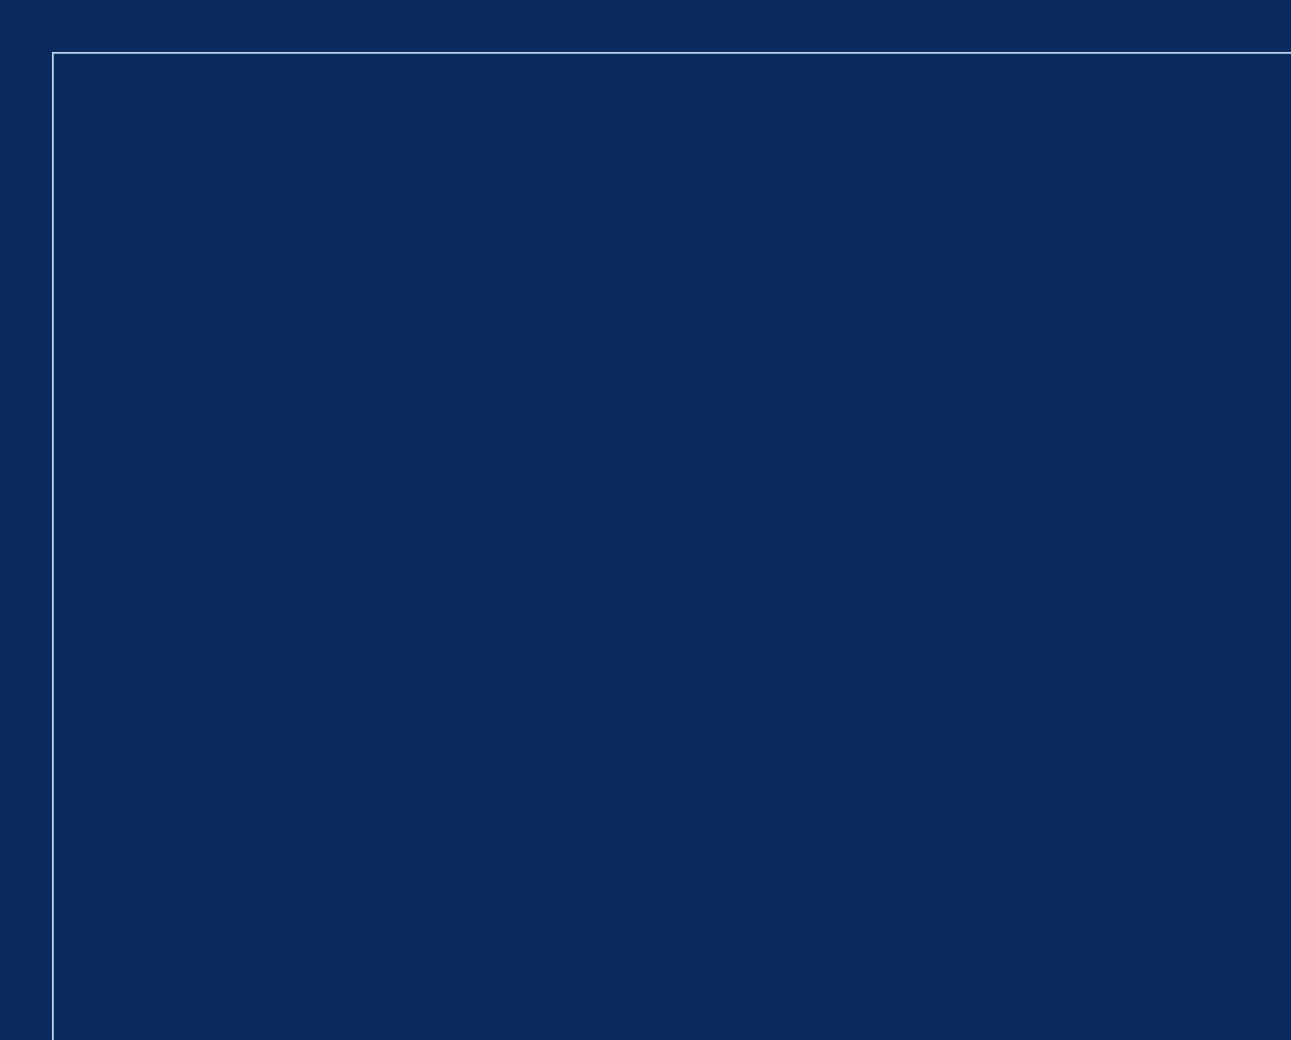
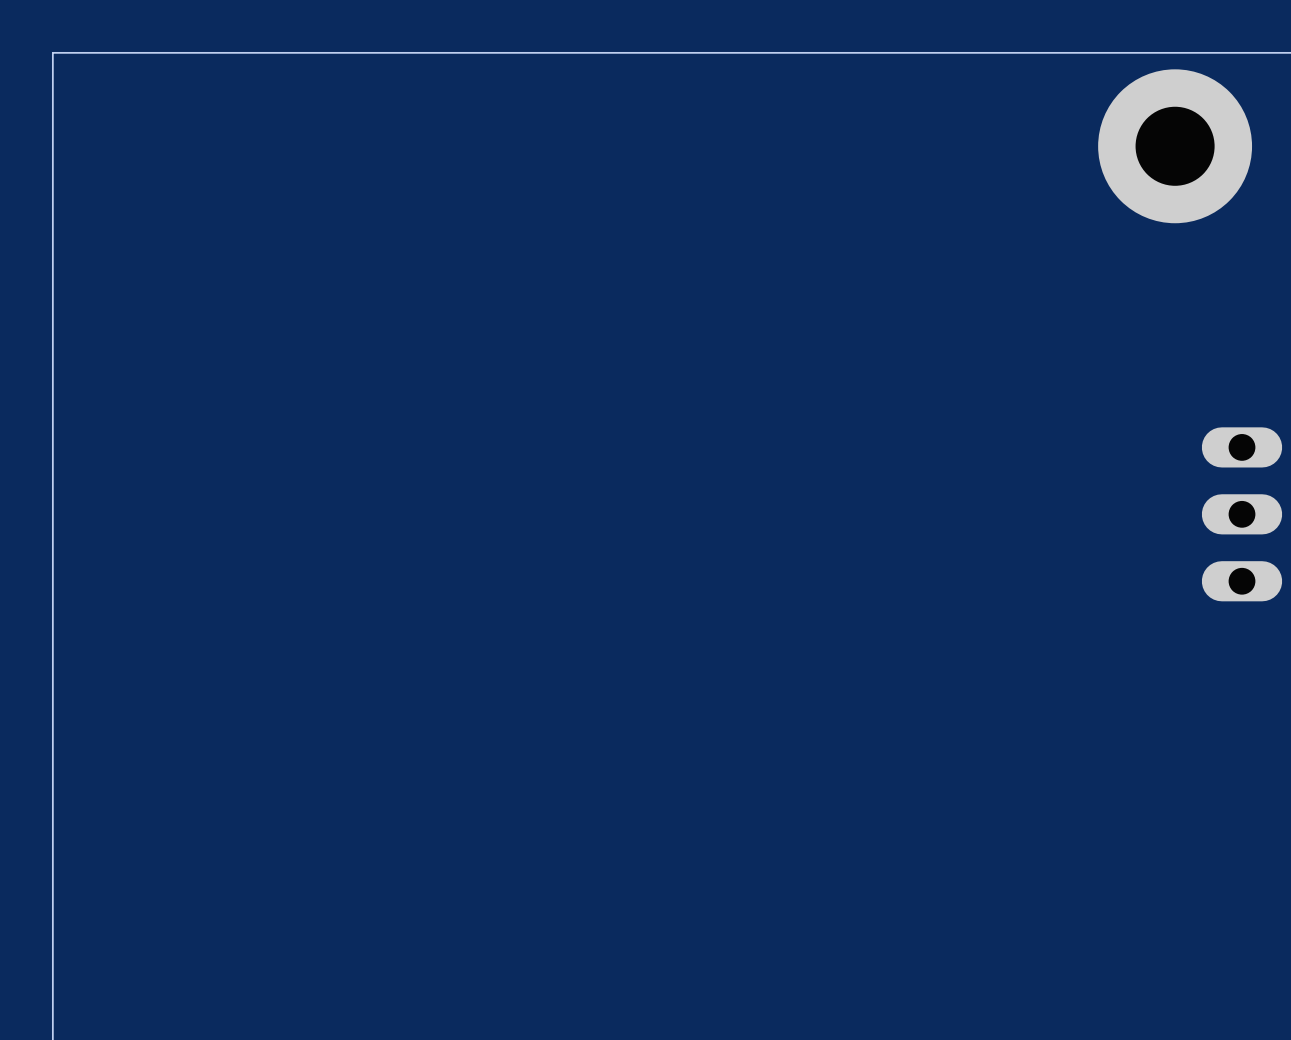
part: none -> (1175, 146)
part: none -> (1242, 514)

